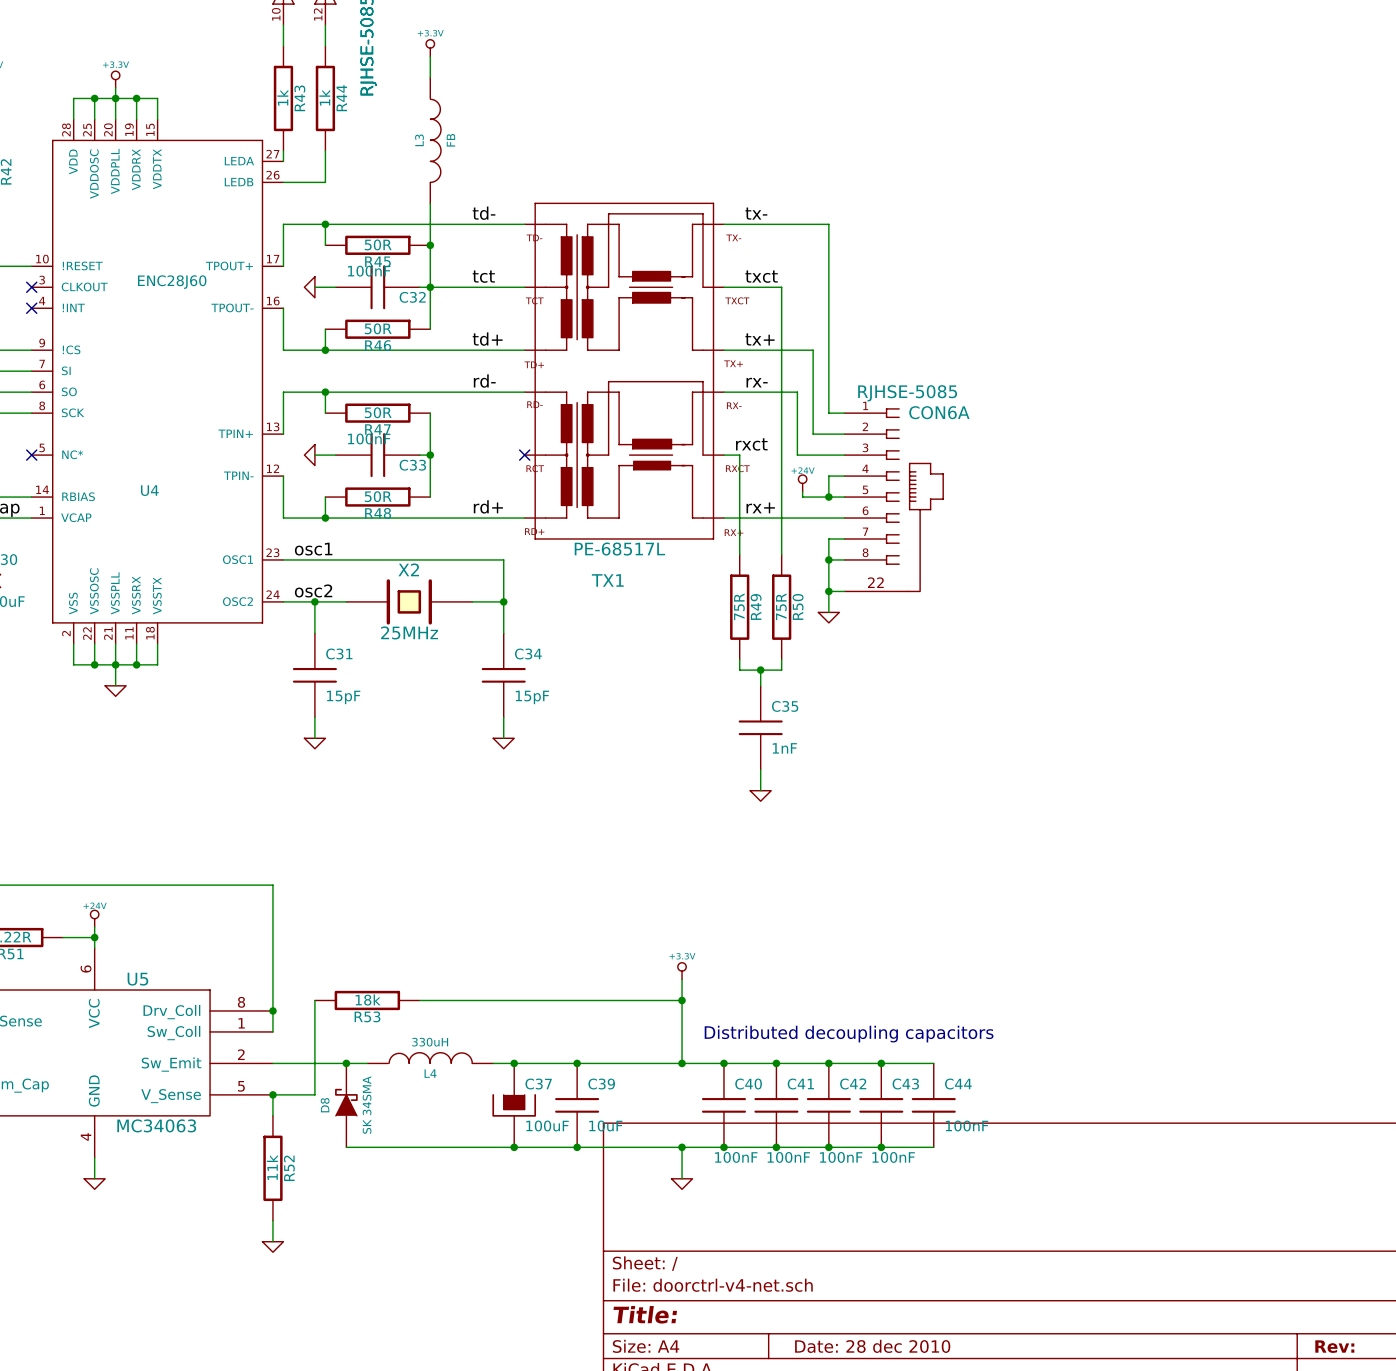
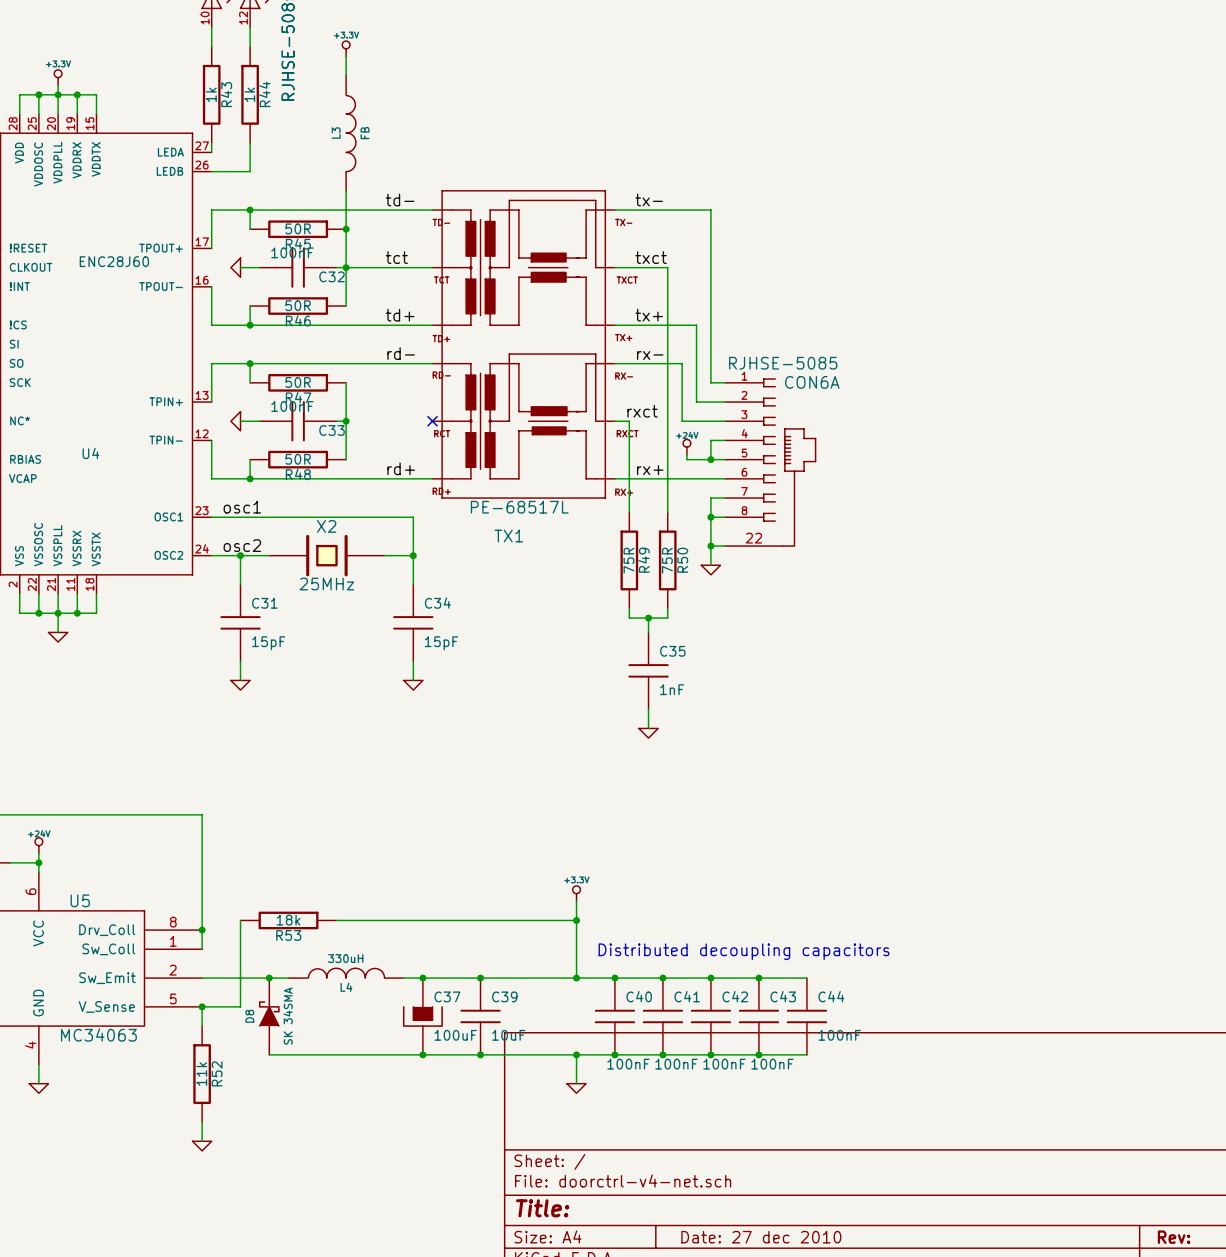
title block: Date: 28 dec 2010 (872, 1346) -> Date: 27 dec 2010 (761, 1237)

